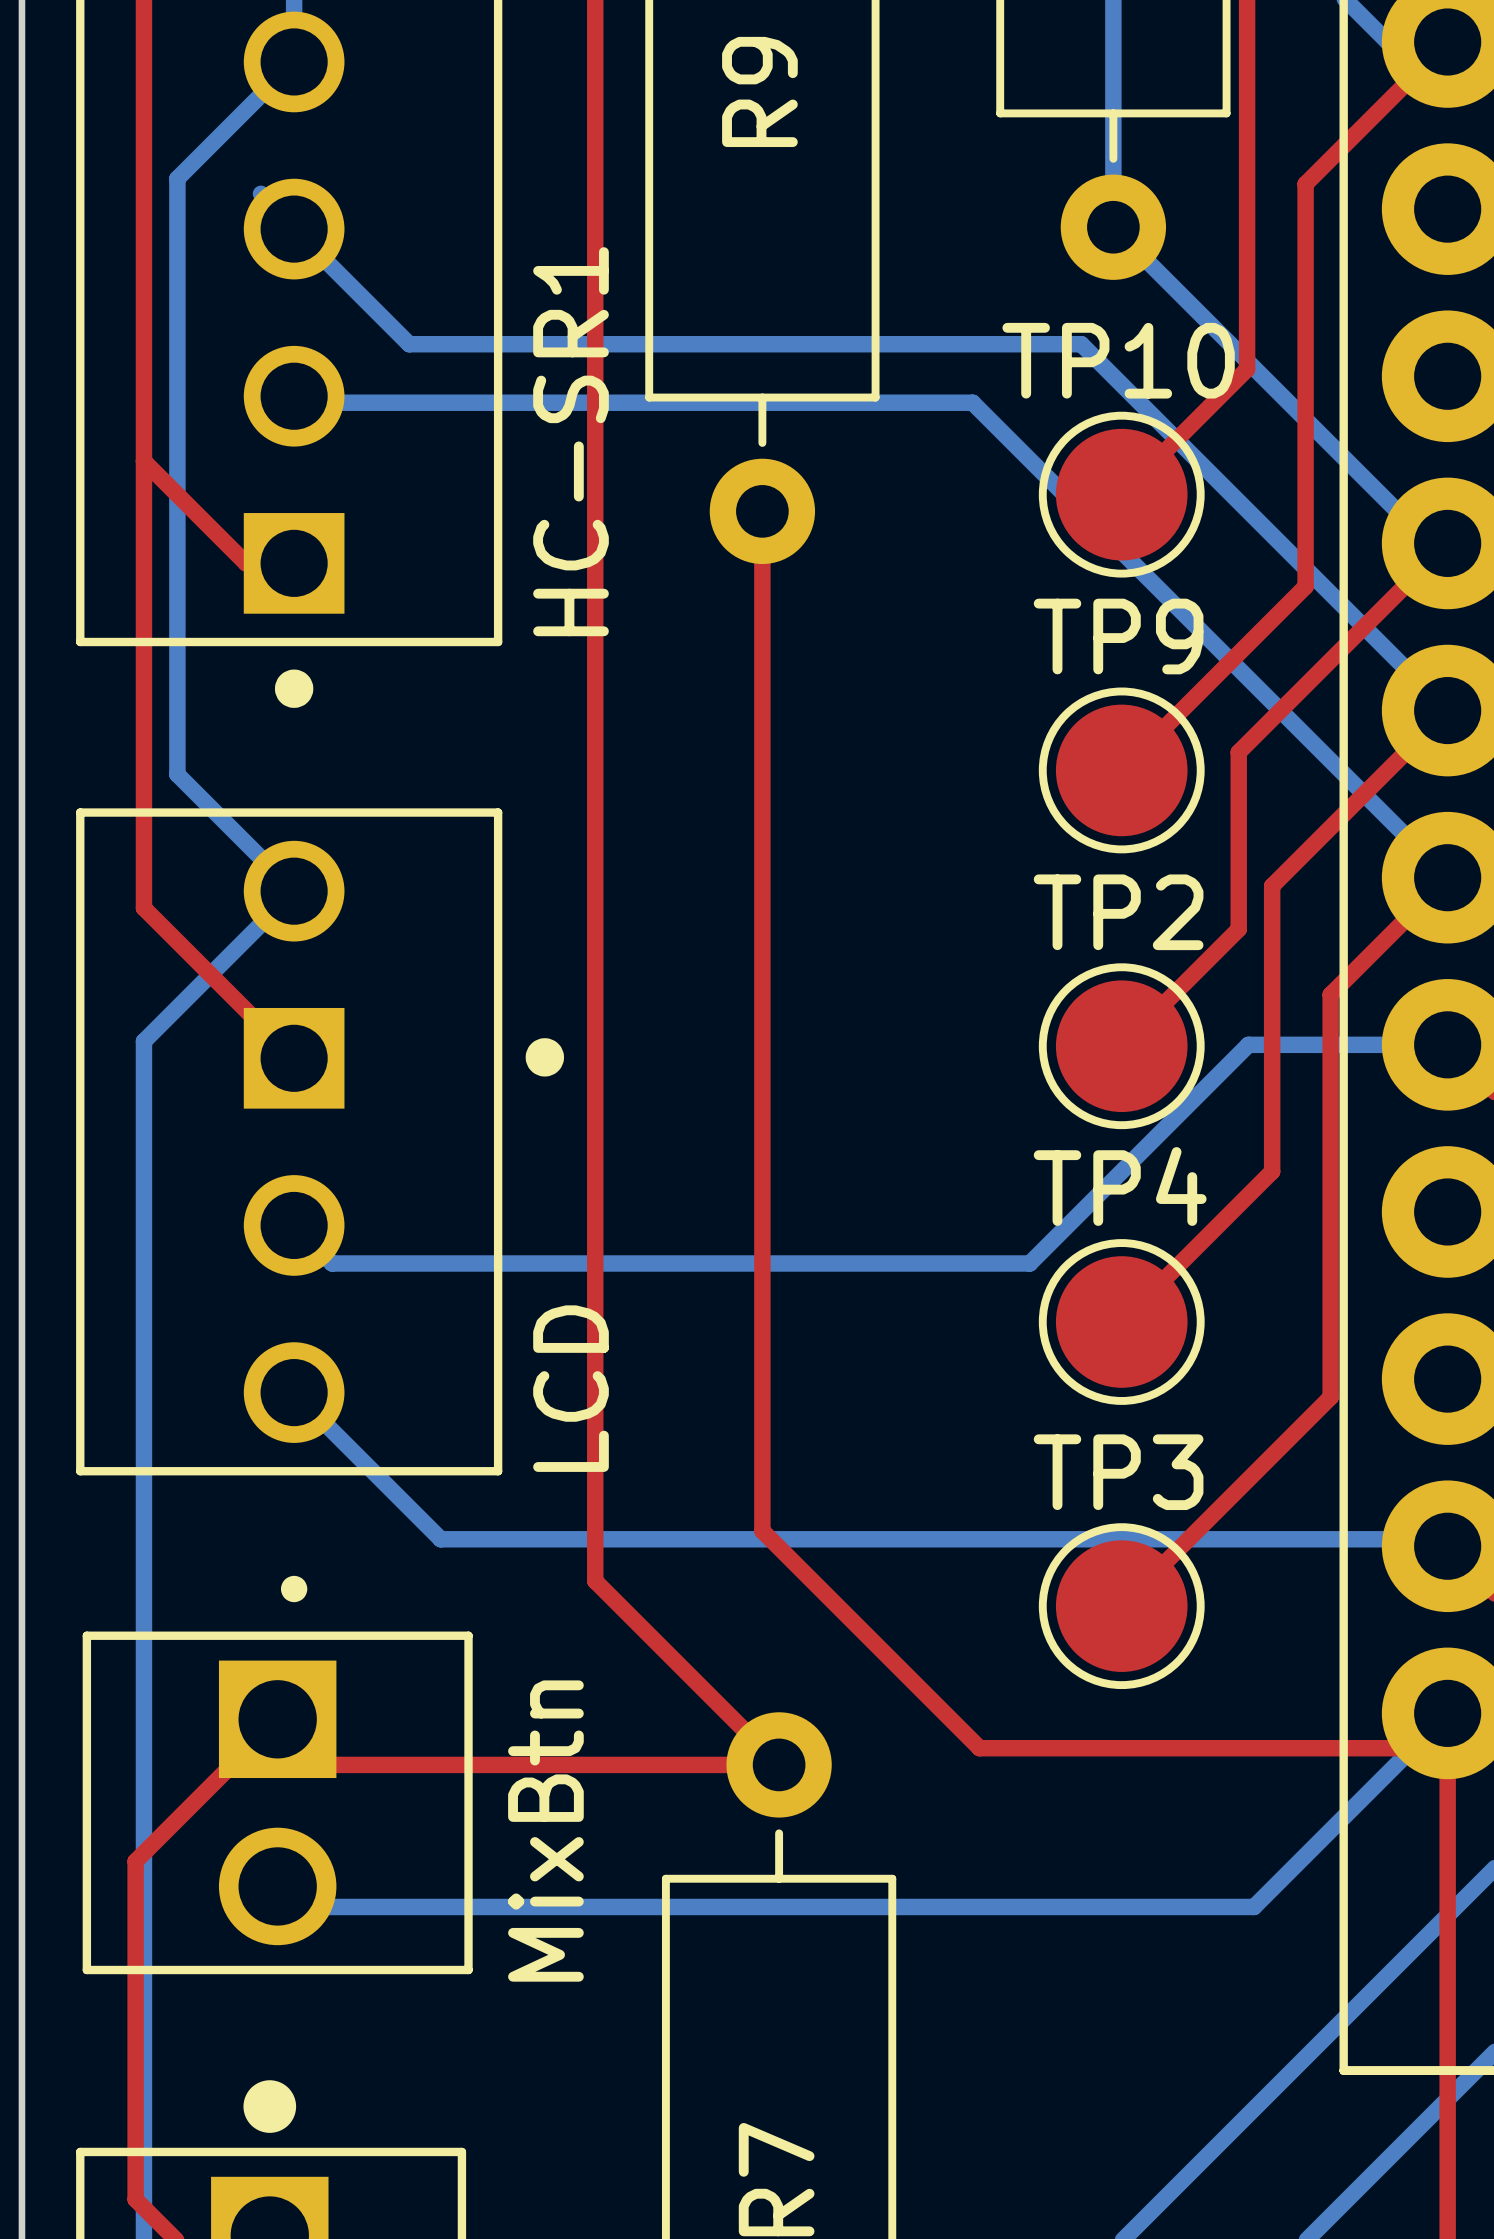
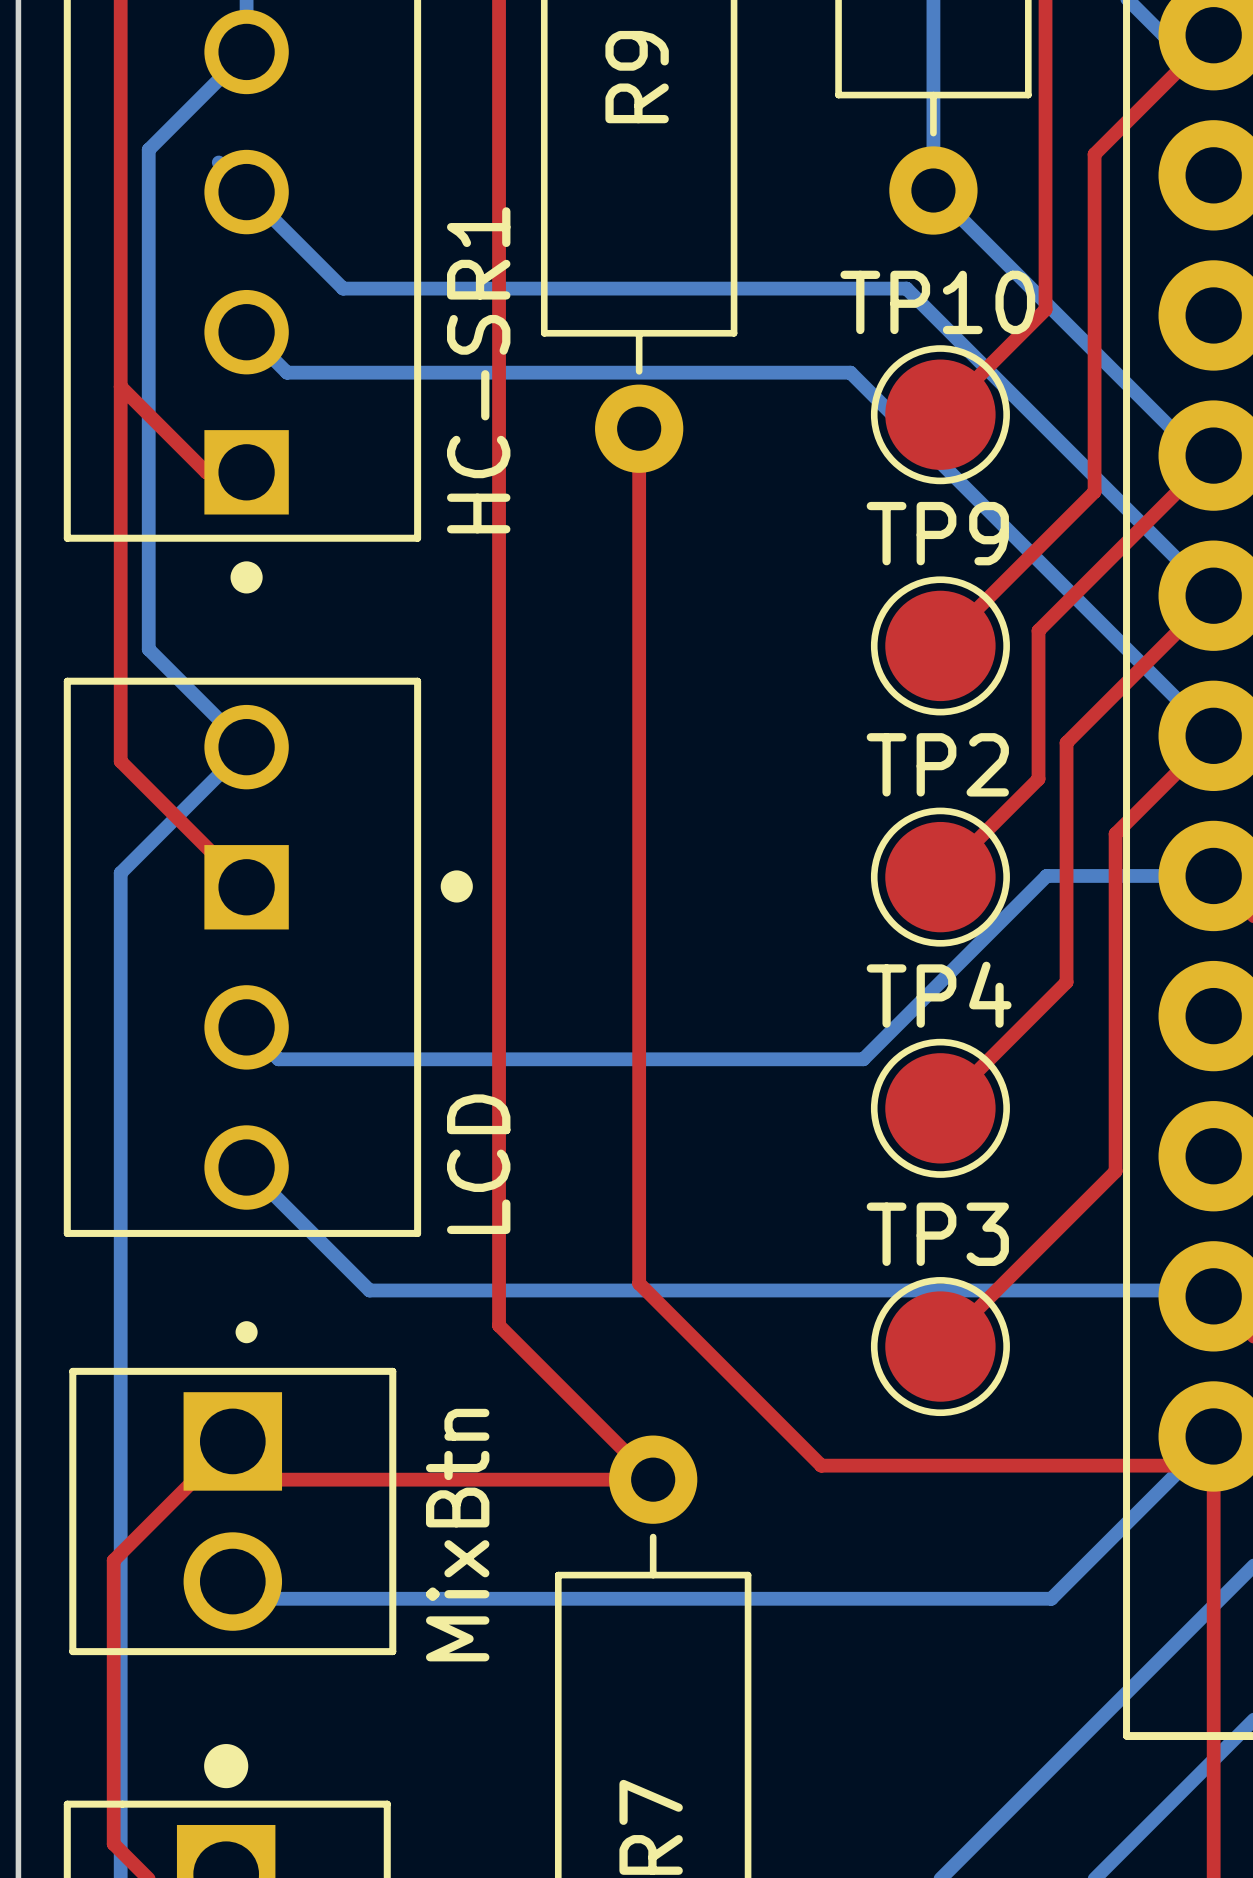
bottom track: (300, 402) (972, 402) (1014, 444) -> (252, 337) (287, 372) (850, 372)

